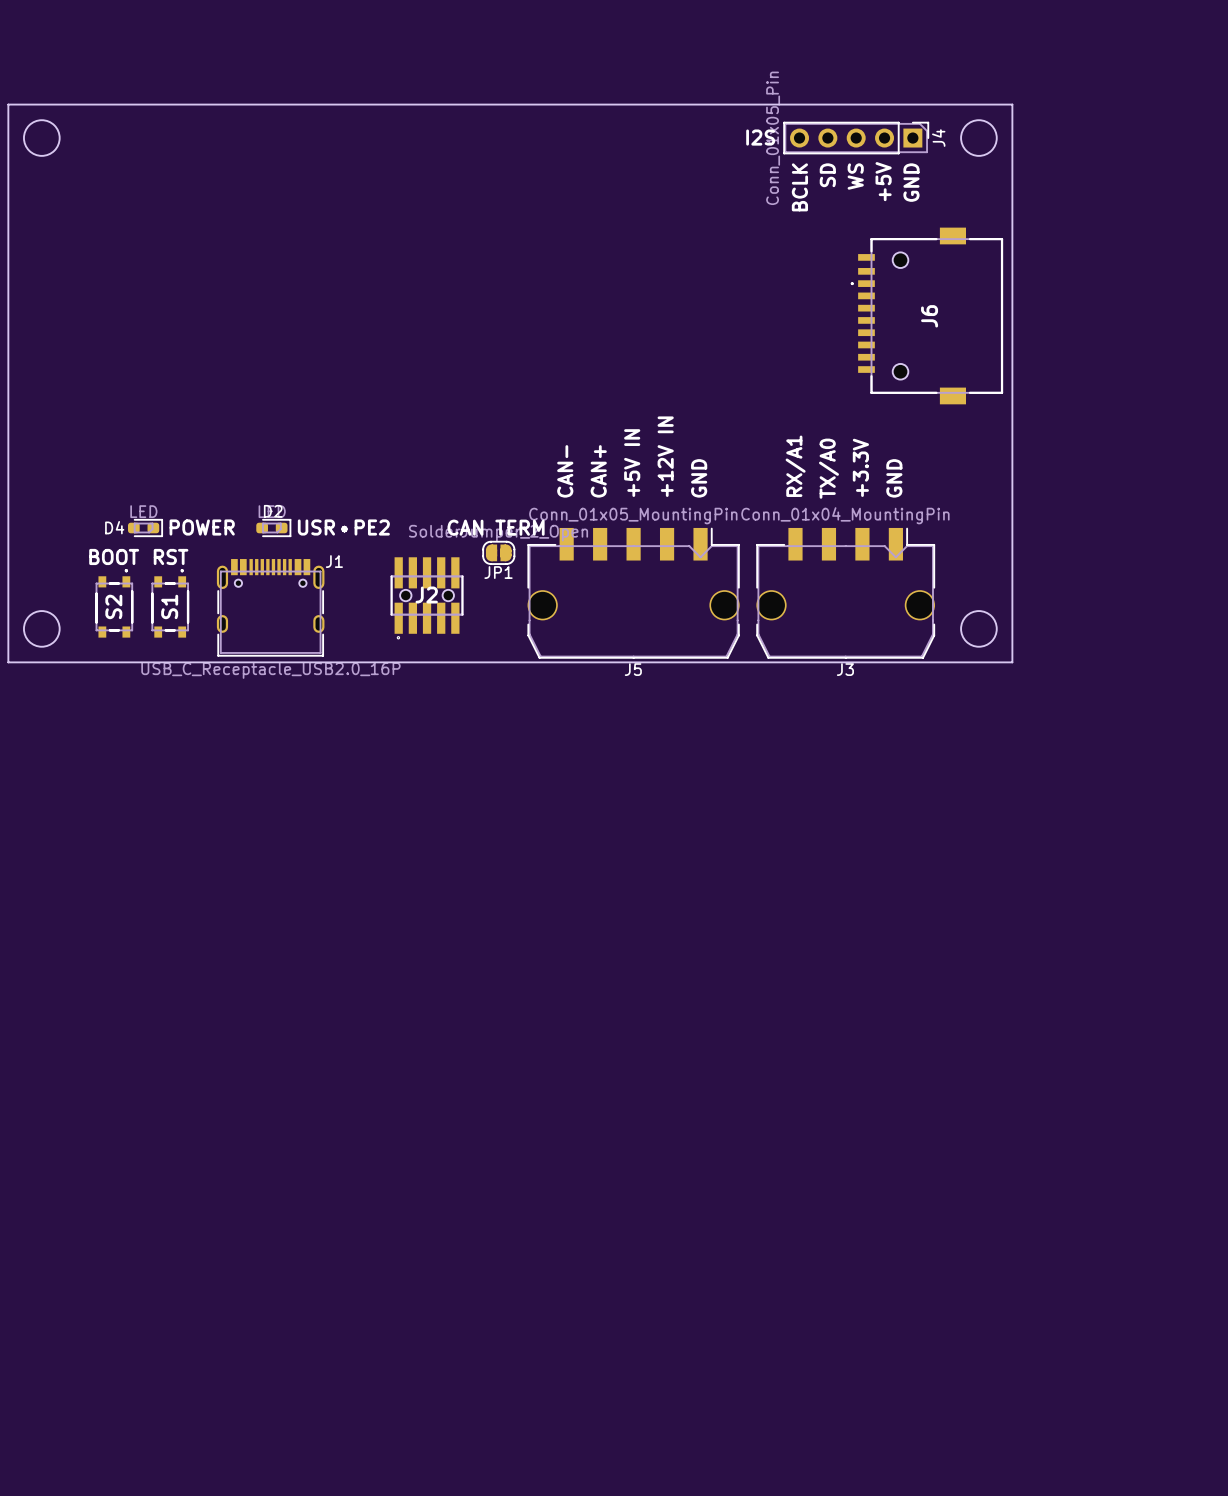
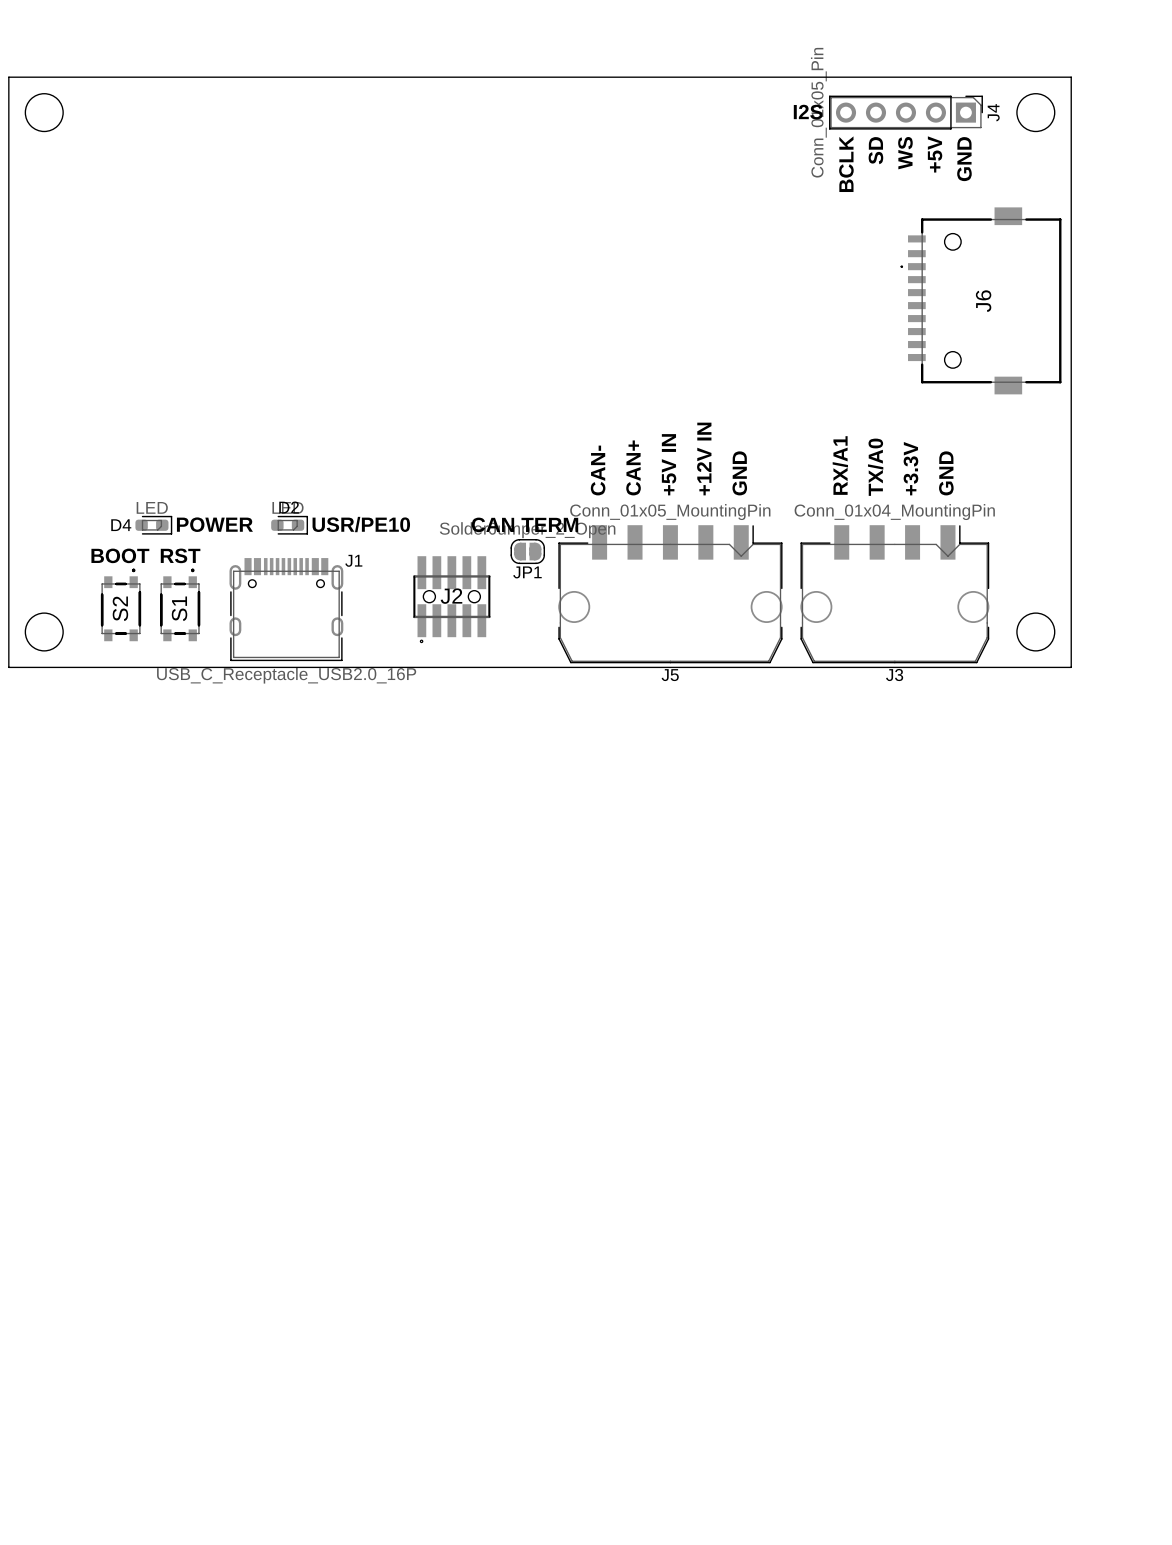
text: USR•PE2 (343, 527) -> USR/PE10 (361, 524)

